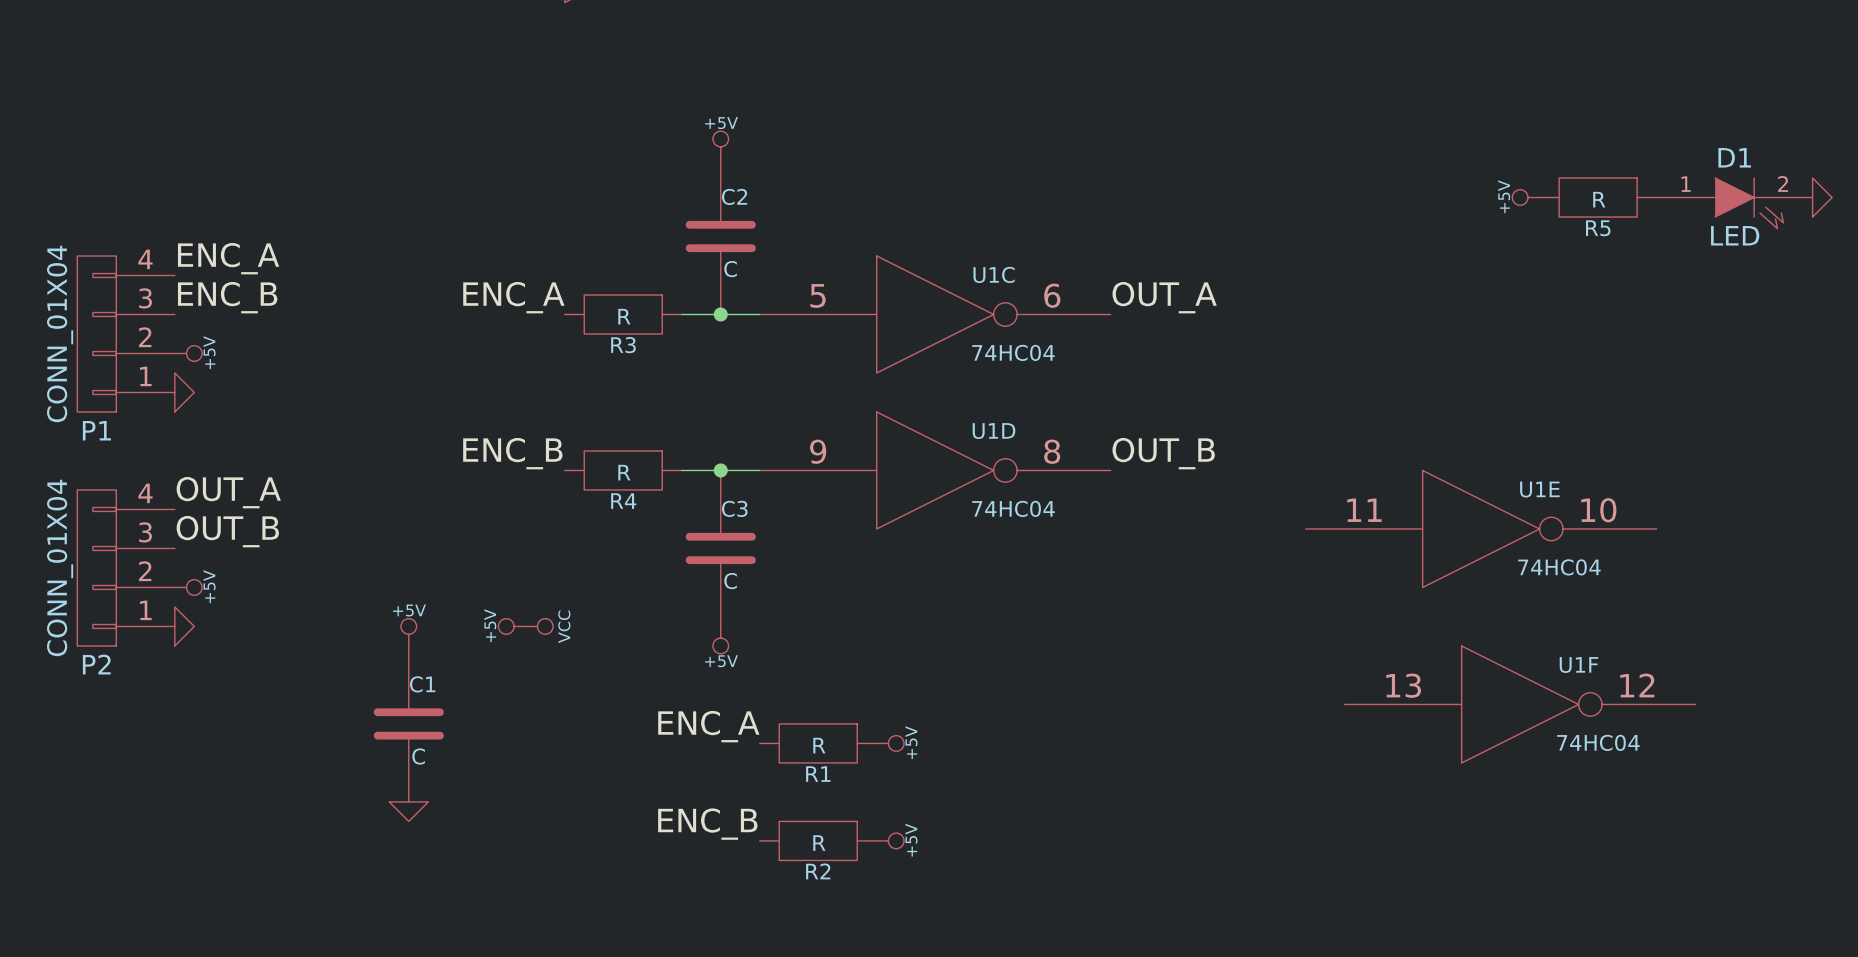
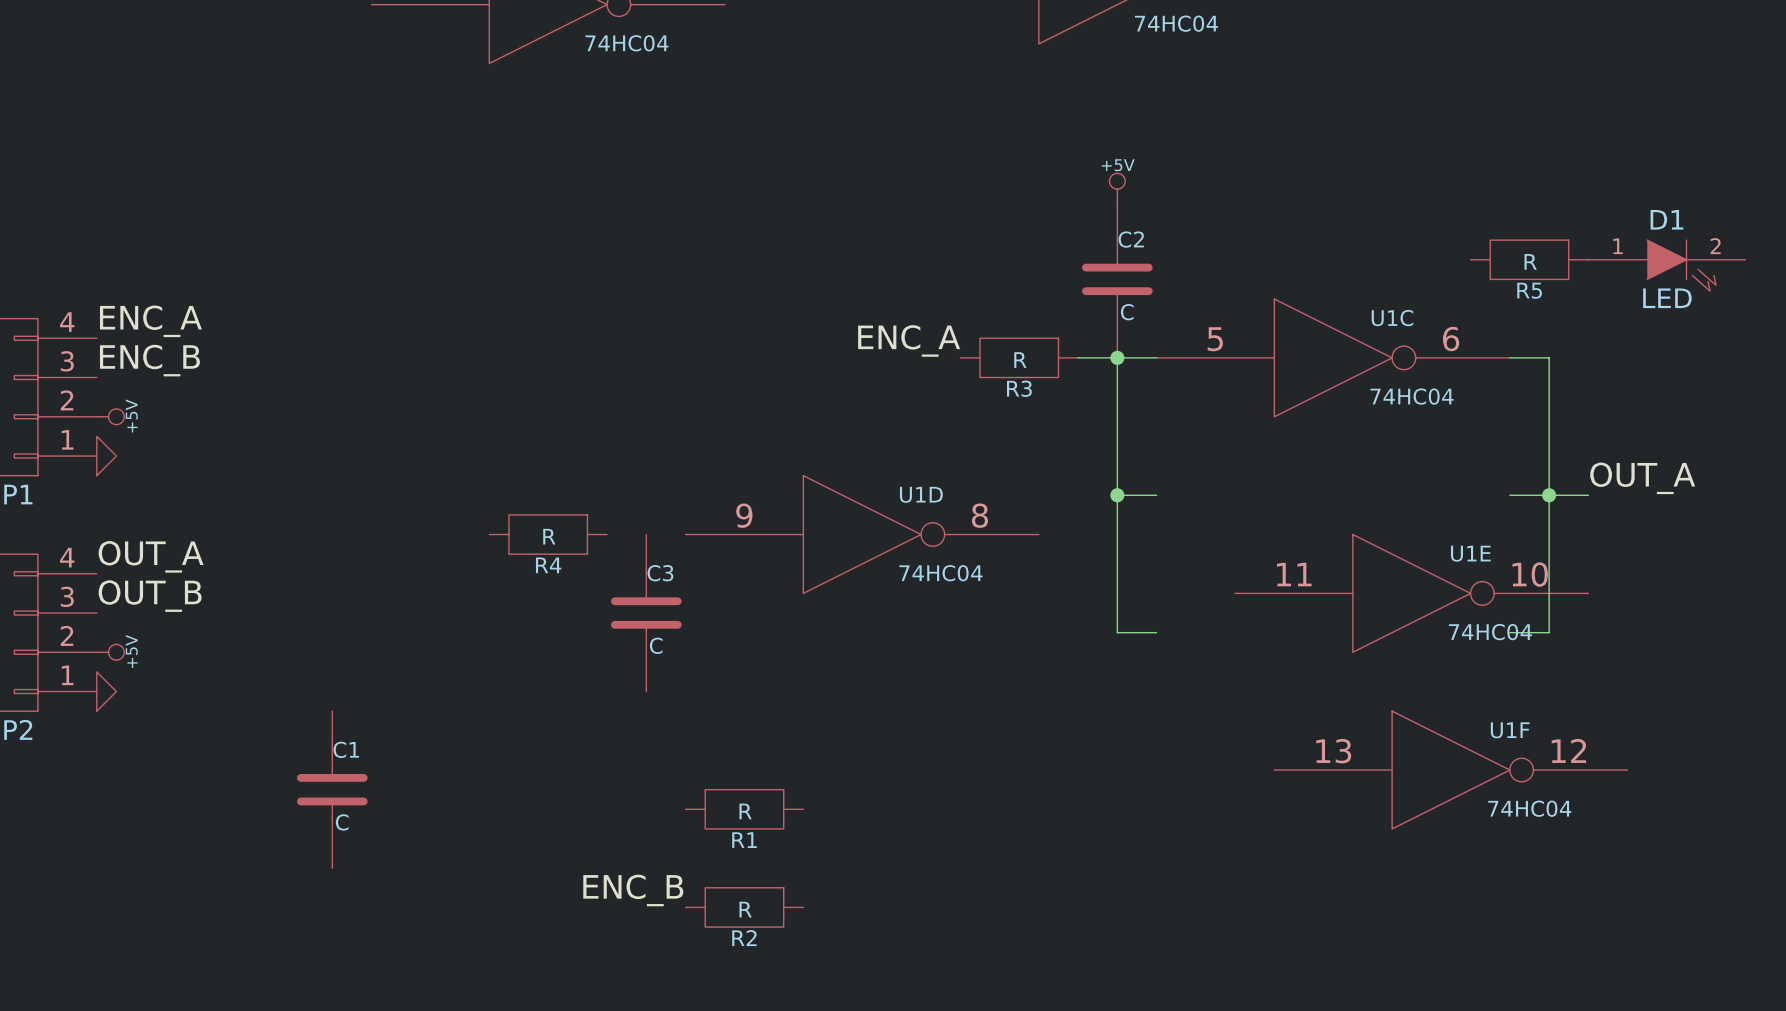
power symbol: none -> +5V (1117, 187)
power symbol: +5V (720, 144) -> none
power symbol: +5V (1525, 197) -> none
power symbol: (1822, 197) -> none
C2 position: (720, 236) -> (1117, 279)
label: none -> ENC_A (909, 340)
wire: none -> (1078, 357) (1156, 357)
wire: none -> (1117, 357) (1117, 632) (1156, 632)
junction: none -> (1117, 357)
wire: none -> (1509, 357) (1549, 357) (1549, 632) (1509, 632)
label: ENC_A (513, 297) -> none
label: OUT_A (1164, 297) -> none
R3 position: (623, 314) -> (1019, 357)
wire: (681, 314) (759, 314) -> none
junction: (720, 314) -> none
U1C position: (935, 314) -> (1333, 357)
label: none -> OUT_A (1642, 478)
wire: none -> (1117, 495) (1156, 495)
junction: none -> (1117, 495)
wire: none -> (1509, 495) (1588, 495)
junction: none -> (1549, 495)
label: ENC_B (512, 453) -> none
label: OUT_B (1163, 453) -> none
wire: (681, 470) (759, 470) -> none
junction: (720, 470) -> none
power symbol: +5V (512, 626) -> none
power symbol: VCC (539, 626) -> none
power symbol: +5V (408, 632) -> none
power symbol: +5V (720, 640) -> none
label: ENC_A (708, 726) -> none
power symbol: +5V (890, 743) -> none
power symbol: (408, 811) -> none
power symbol: +5V (890, 840) -> none

